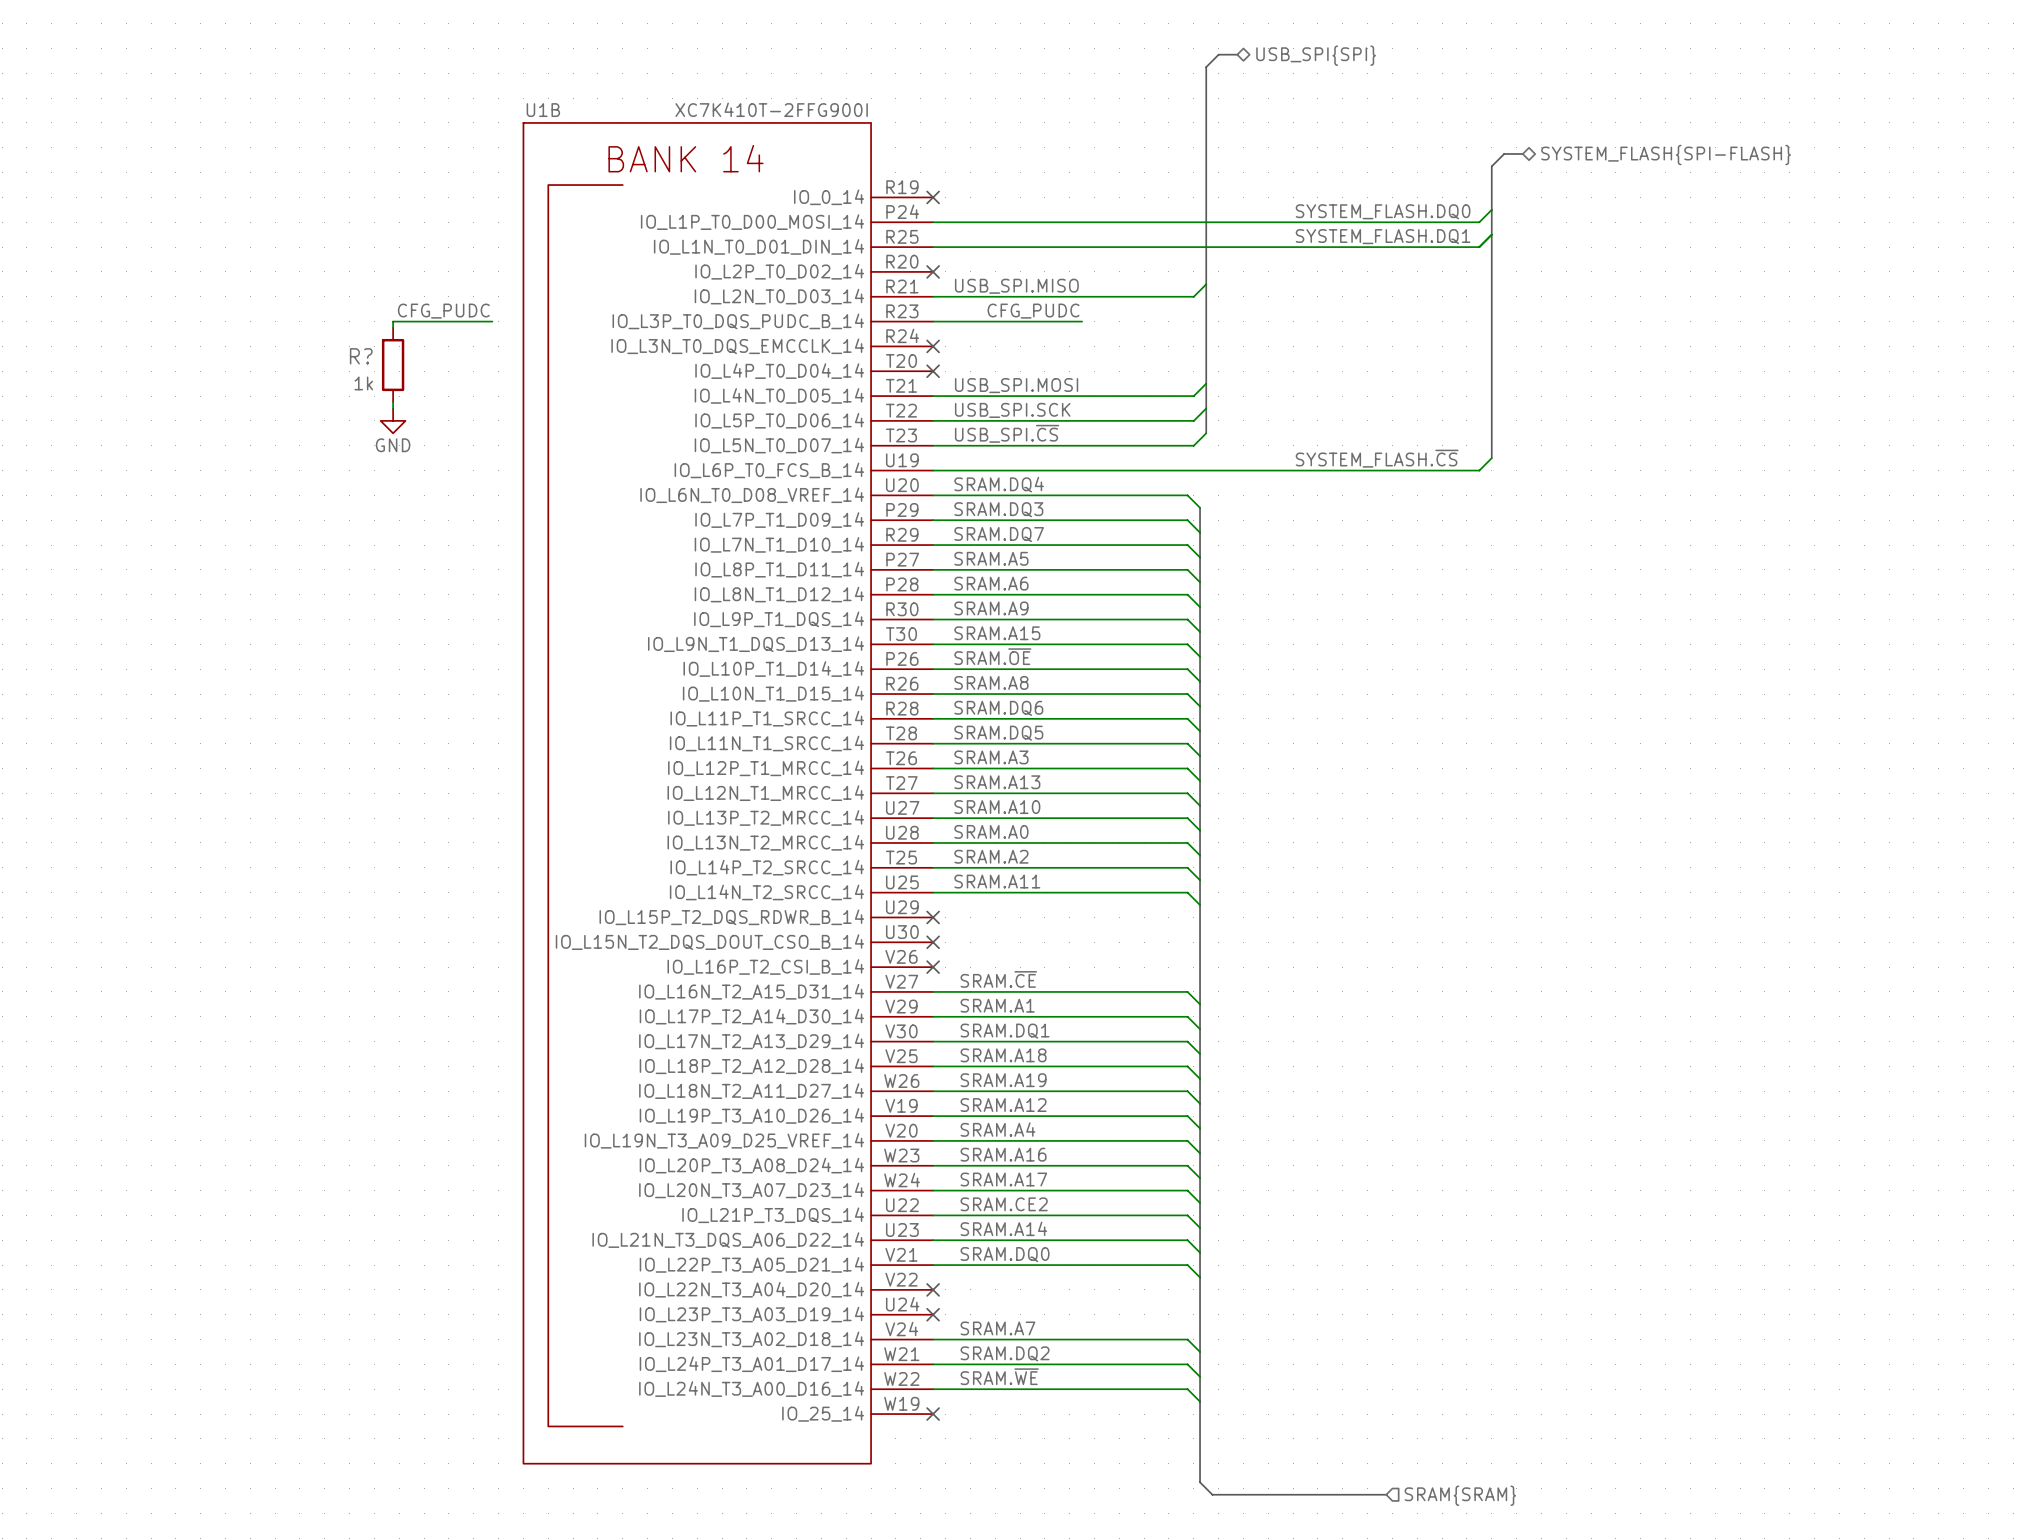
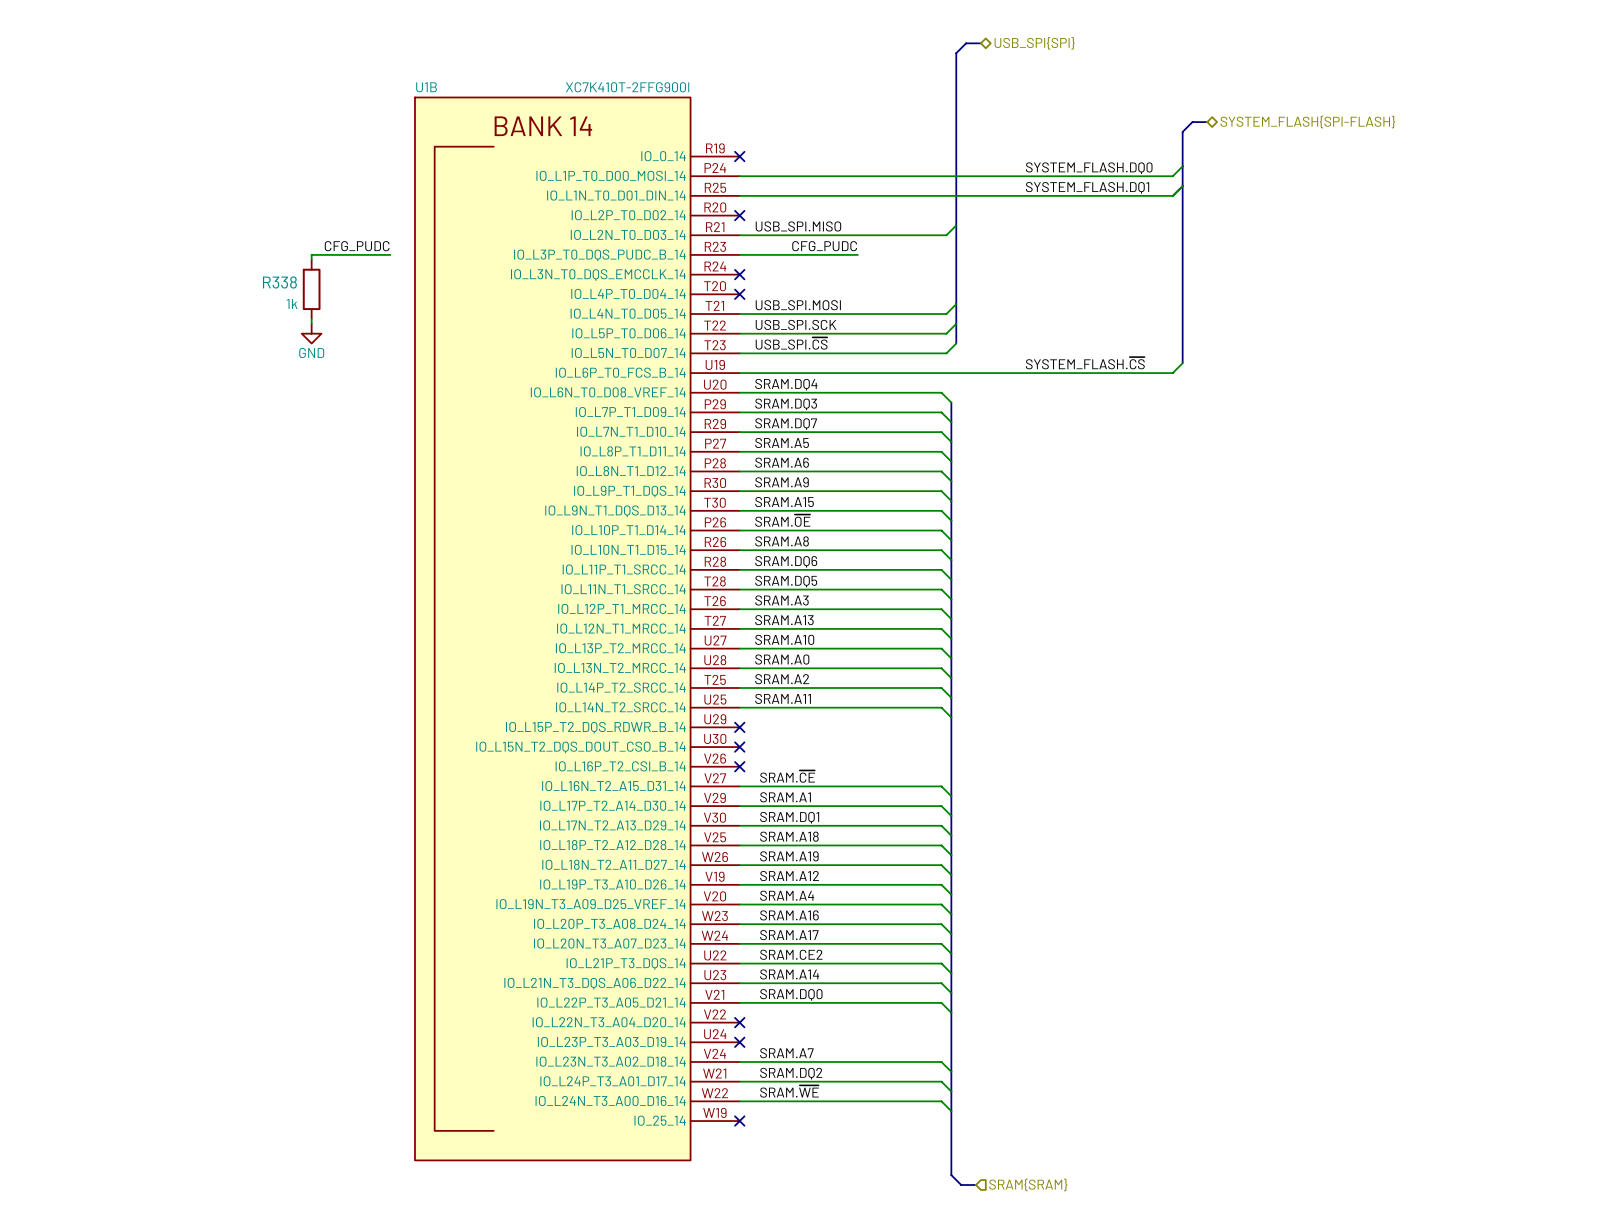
R? name: R? (361, 356) -> R338 (279, 282)
bus: (1231, 1494) (1386, 1494) -> none
hierarchical label position: SRAM{SRAM} (1460, 1495) -> SRAM{SRAM} (1028, 1184)

